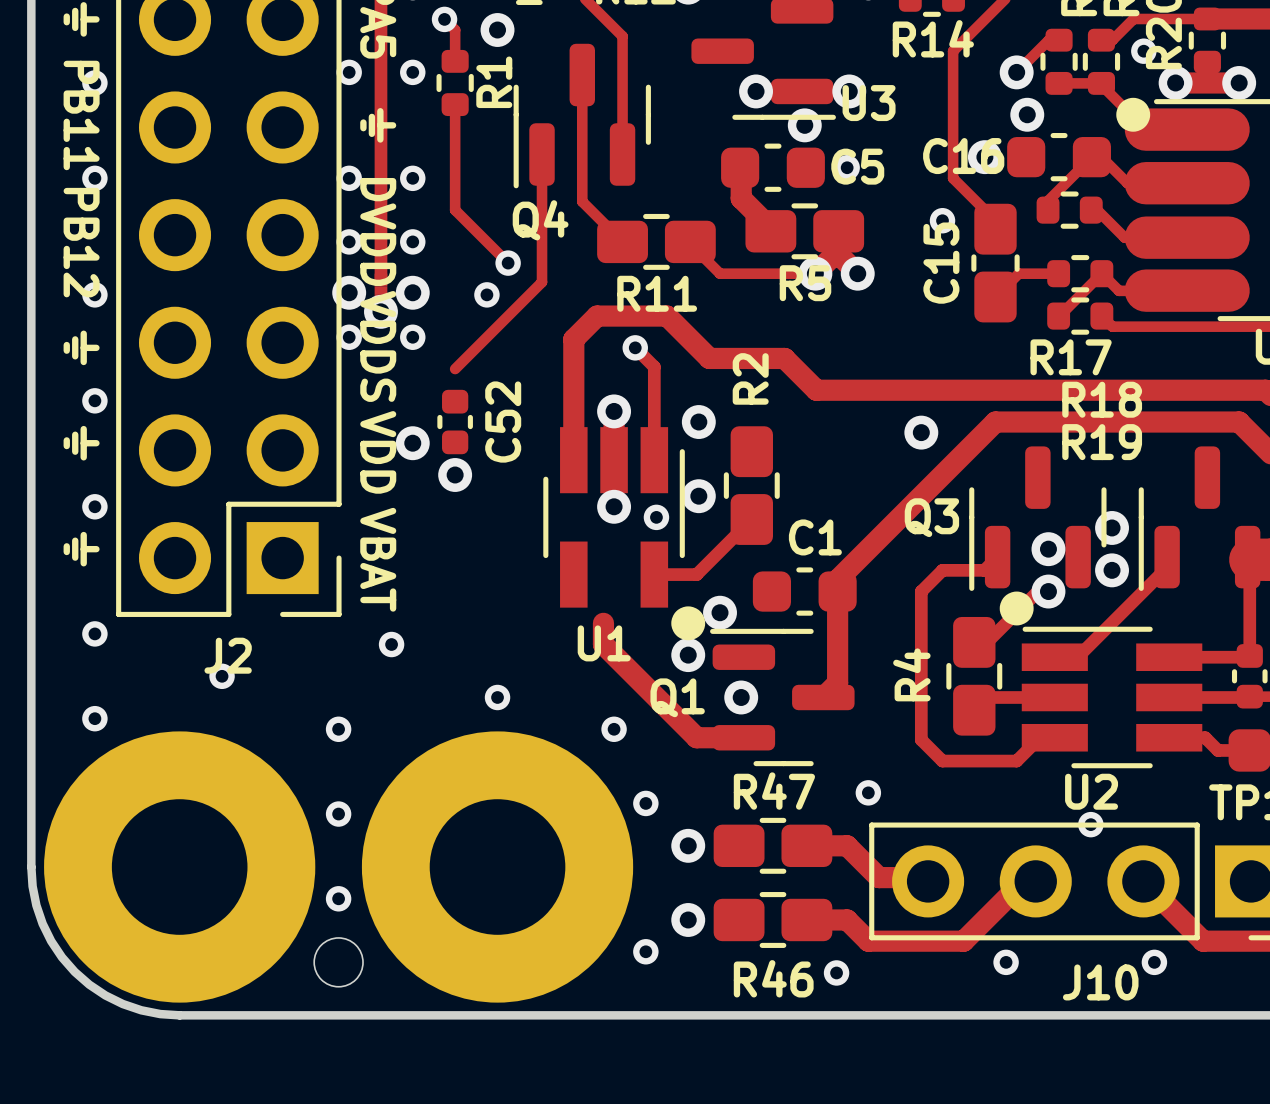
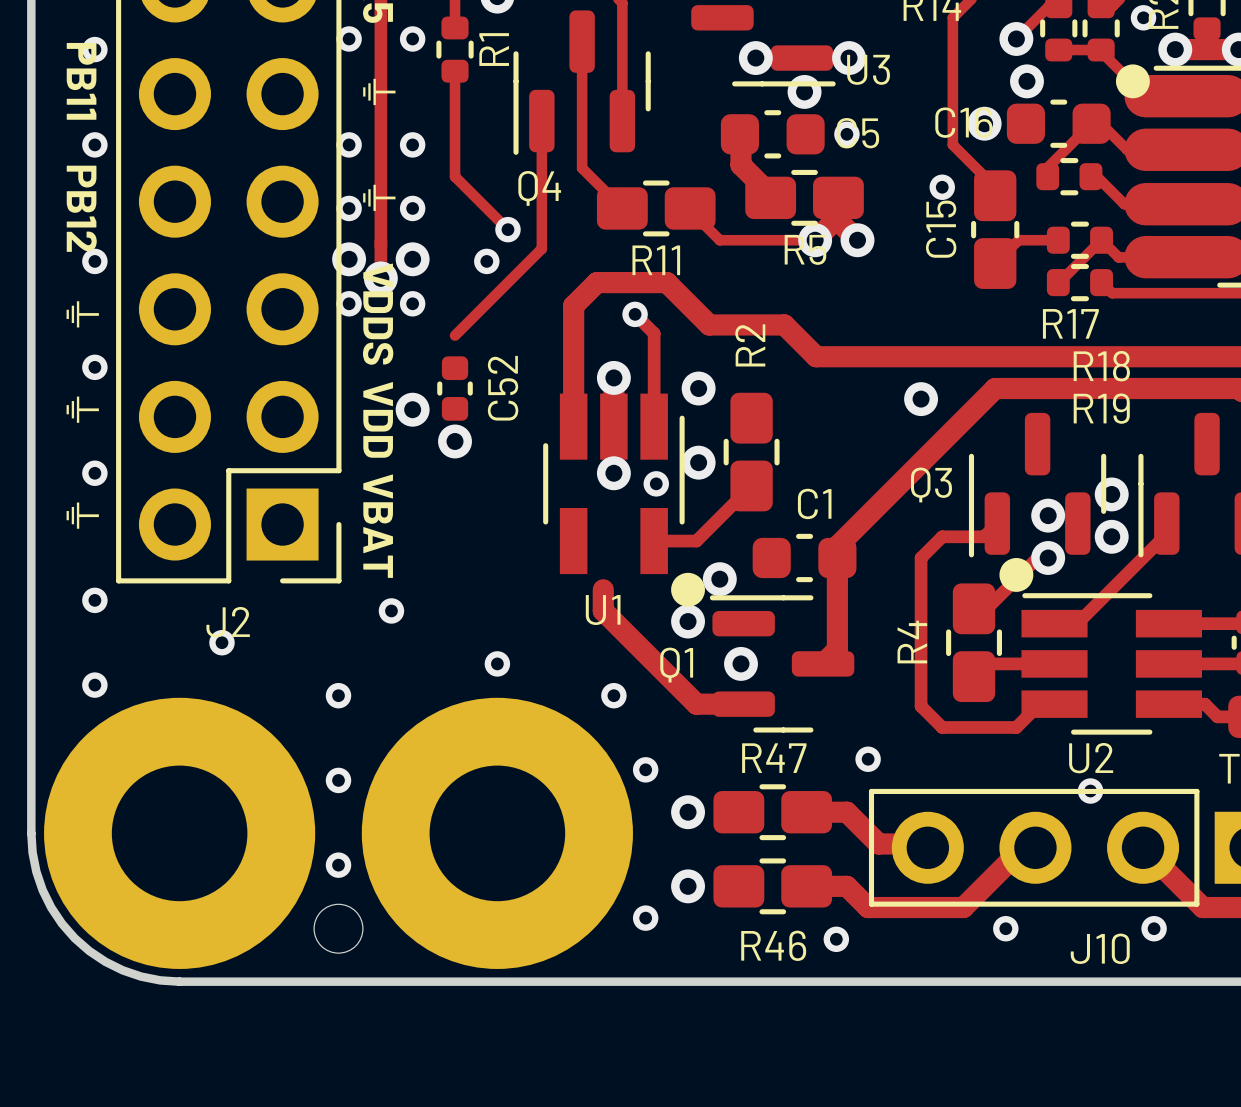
text: DVDD (378, 232) -> ⏚ (379, 197)

